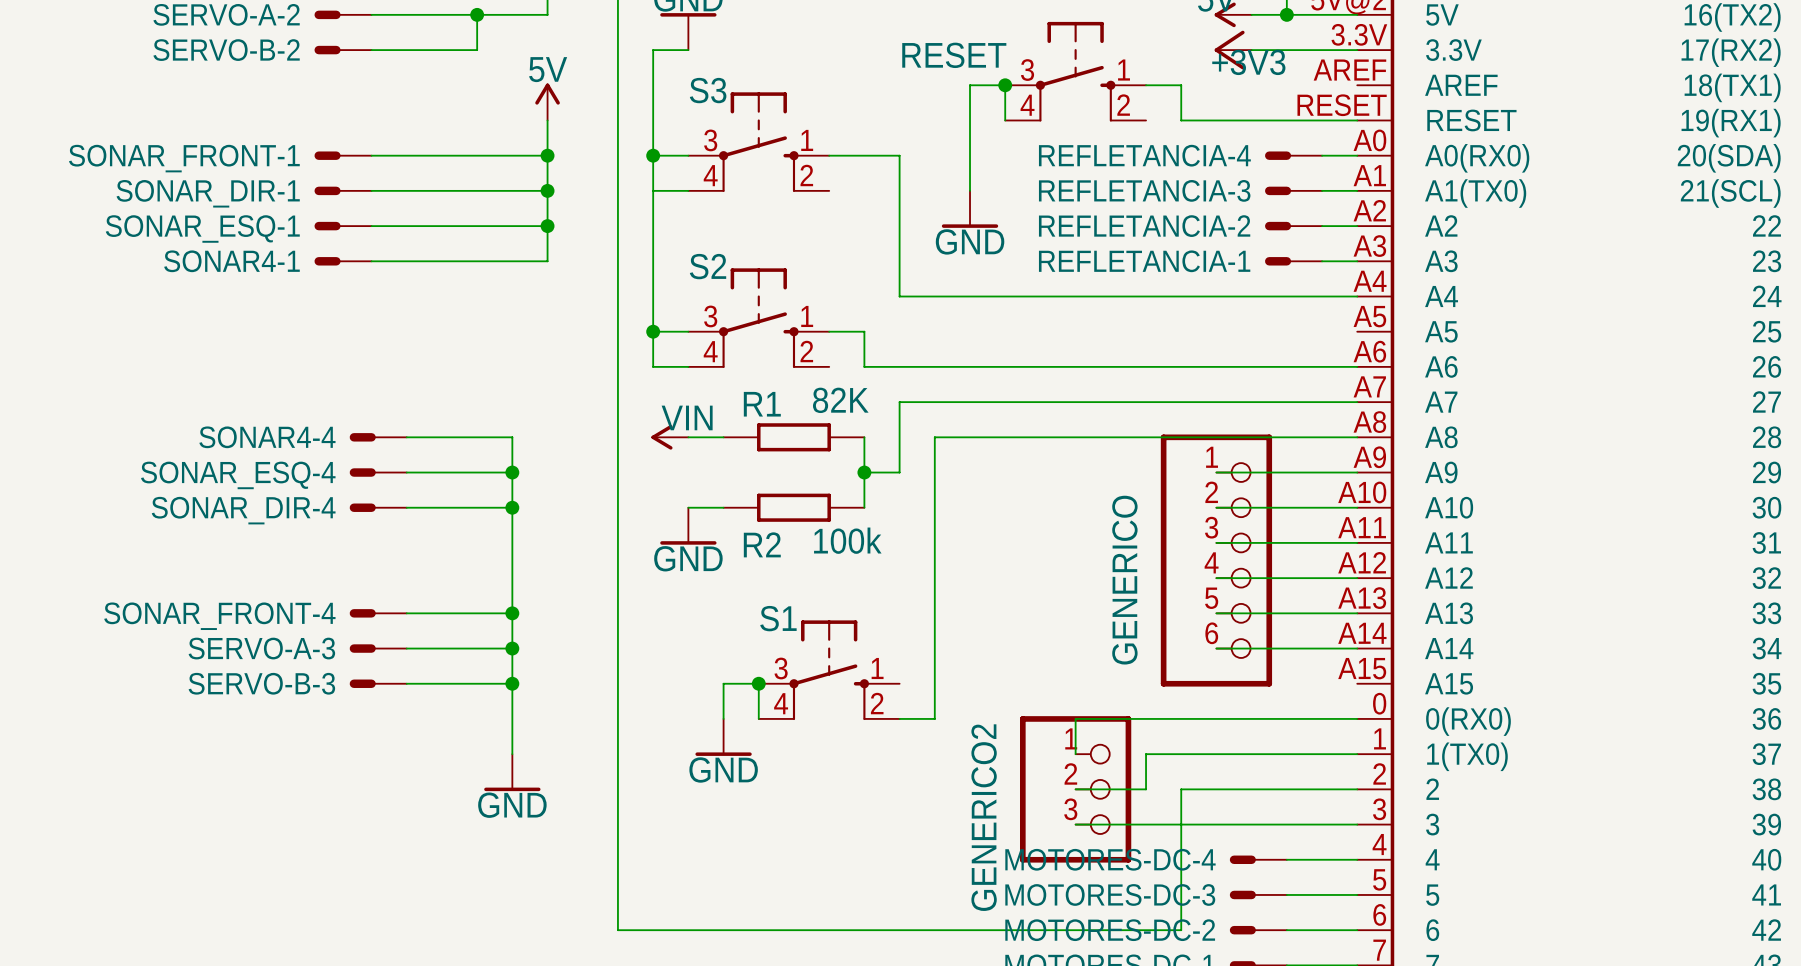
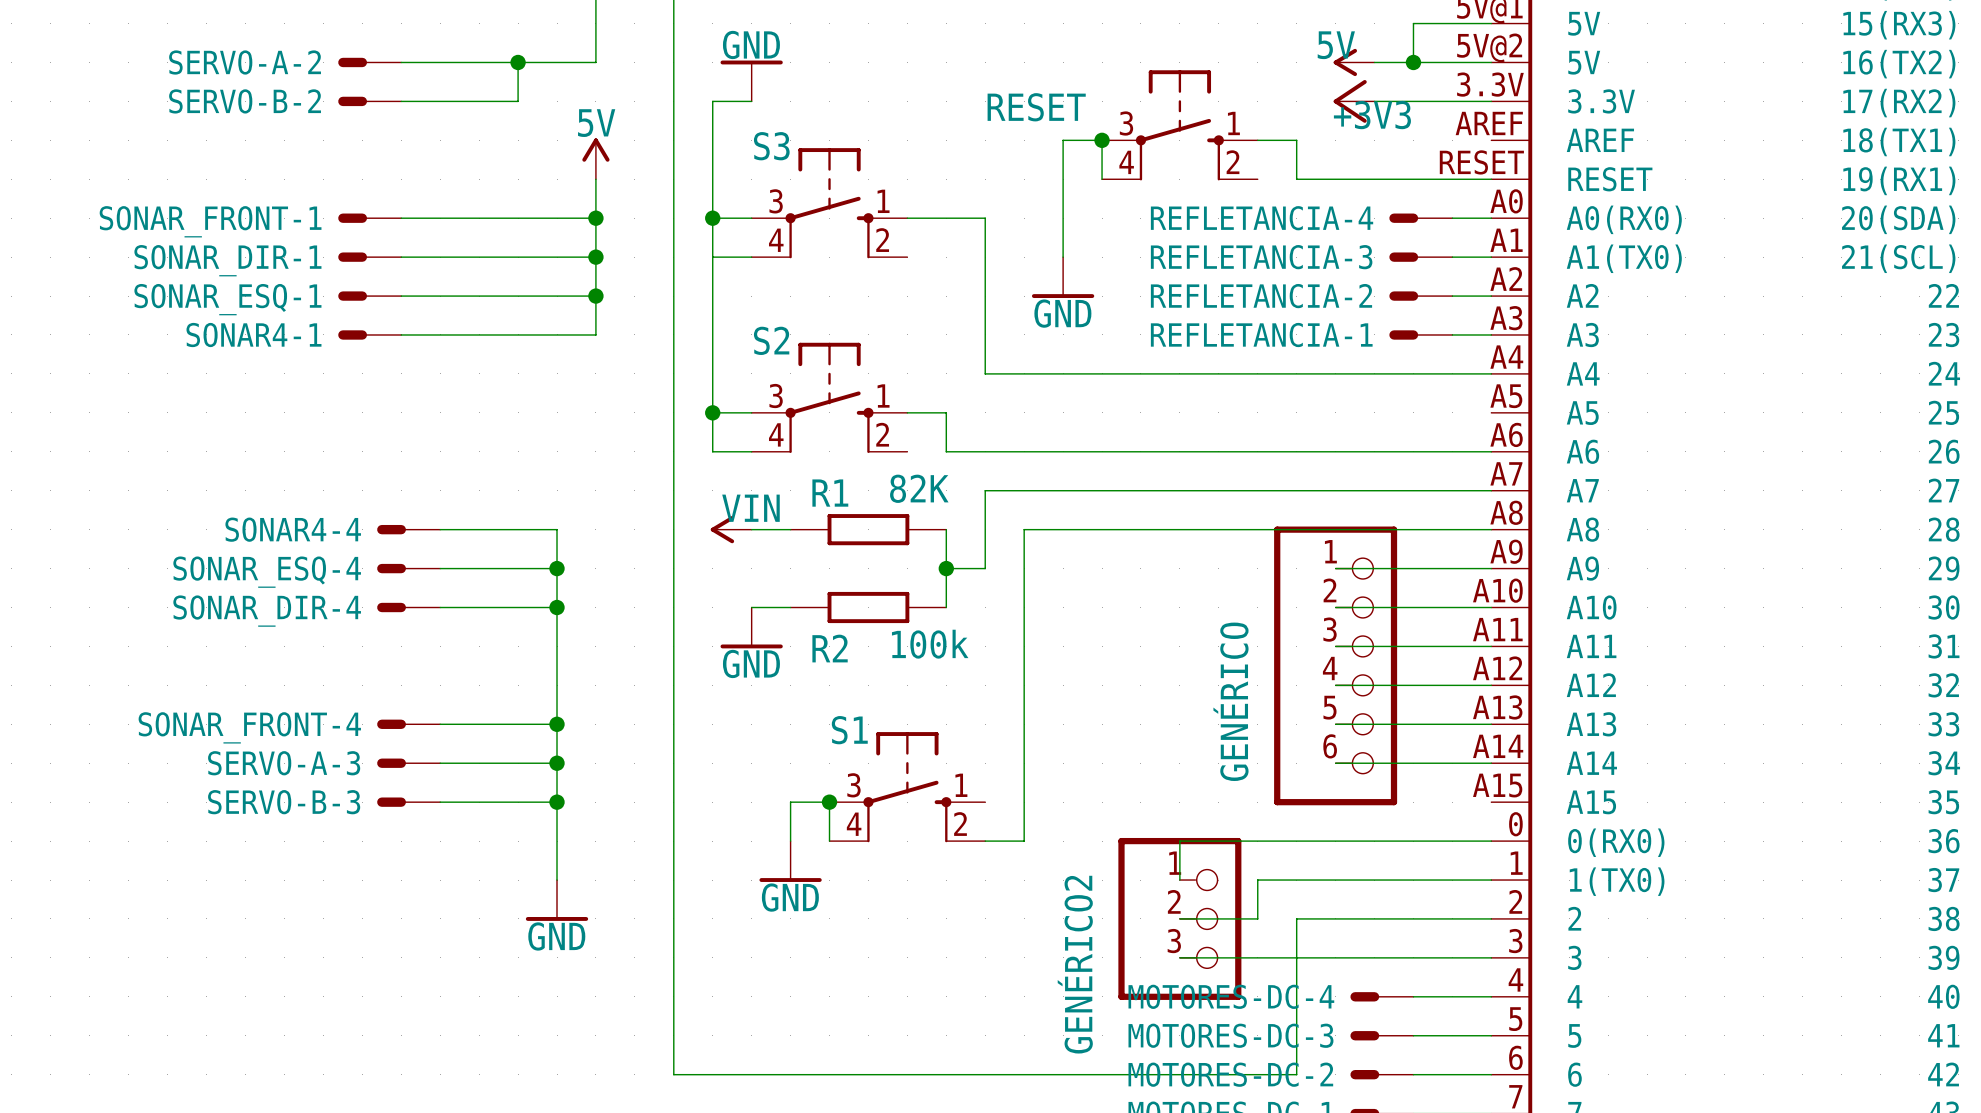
GENERICO name: GENERICO (1124, 580) -> GENÉRICO (1230, 701)
GENERICO2 name: GENERICO2 (984, 817) -> GENÉRICO2 (1075, 964)

